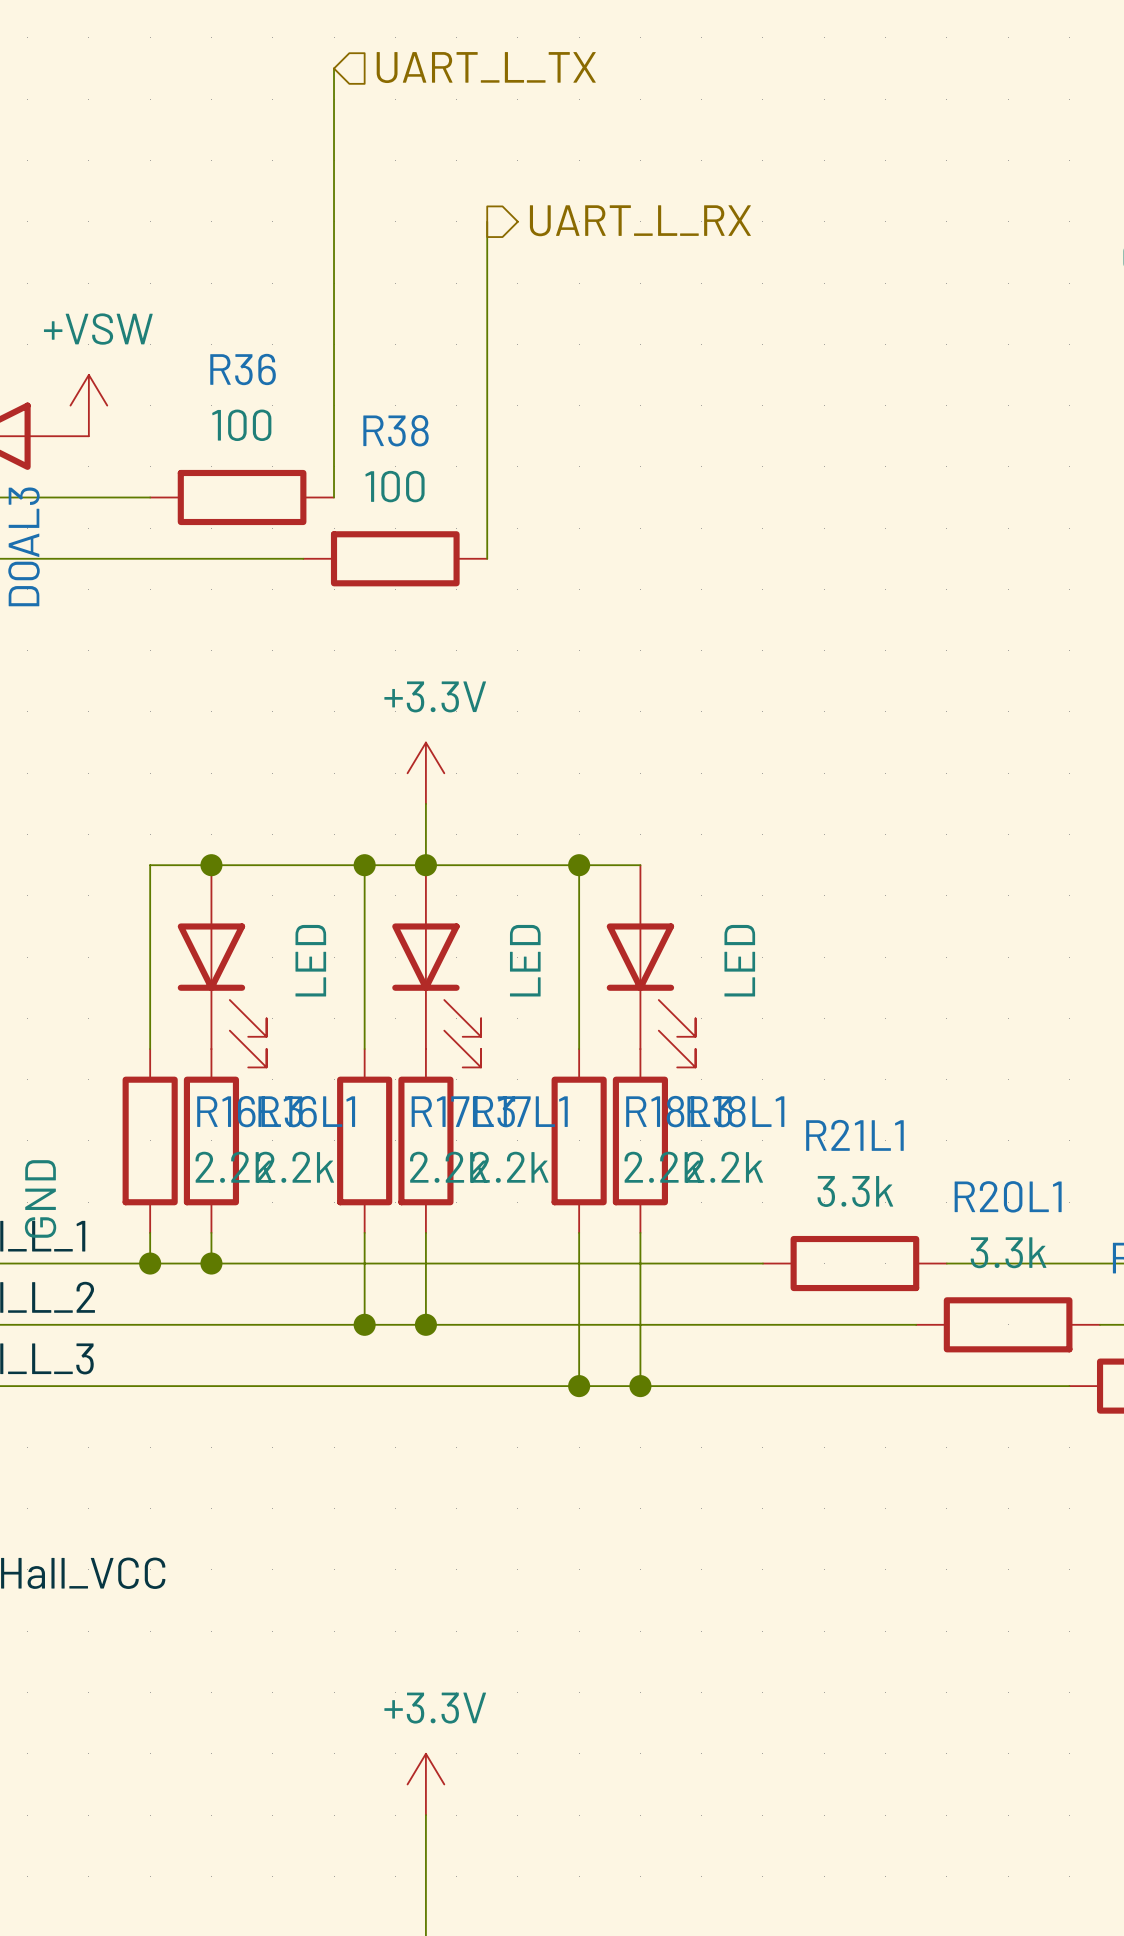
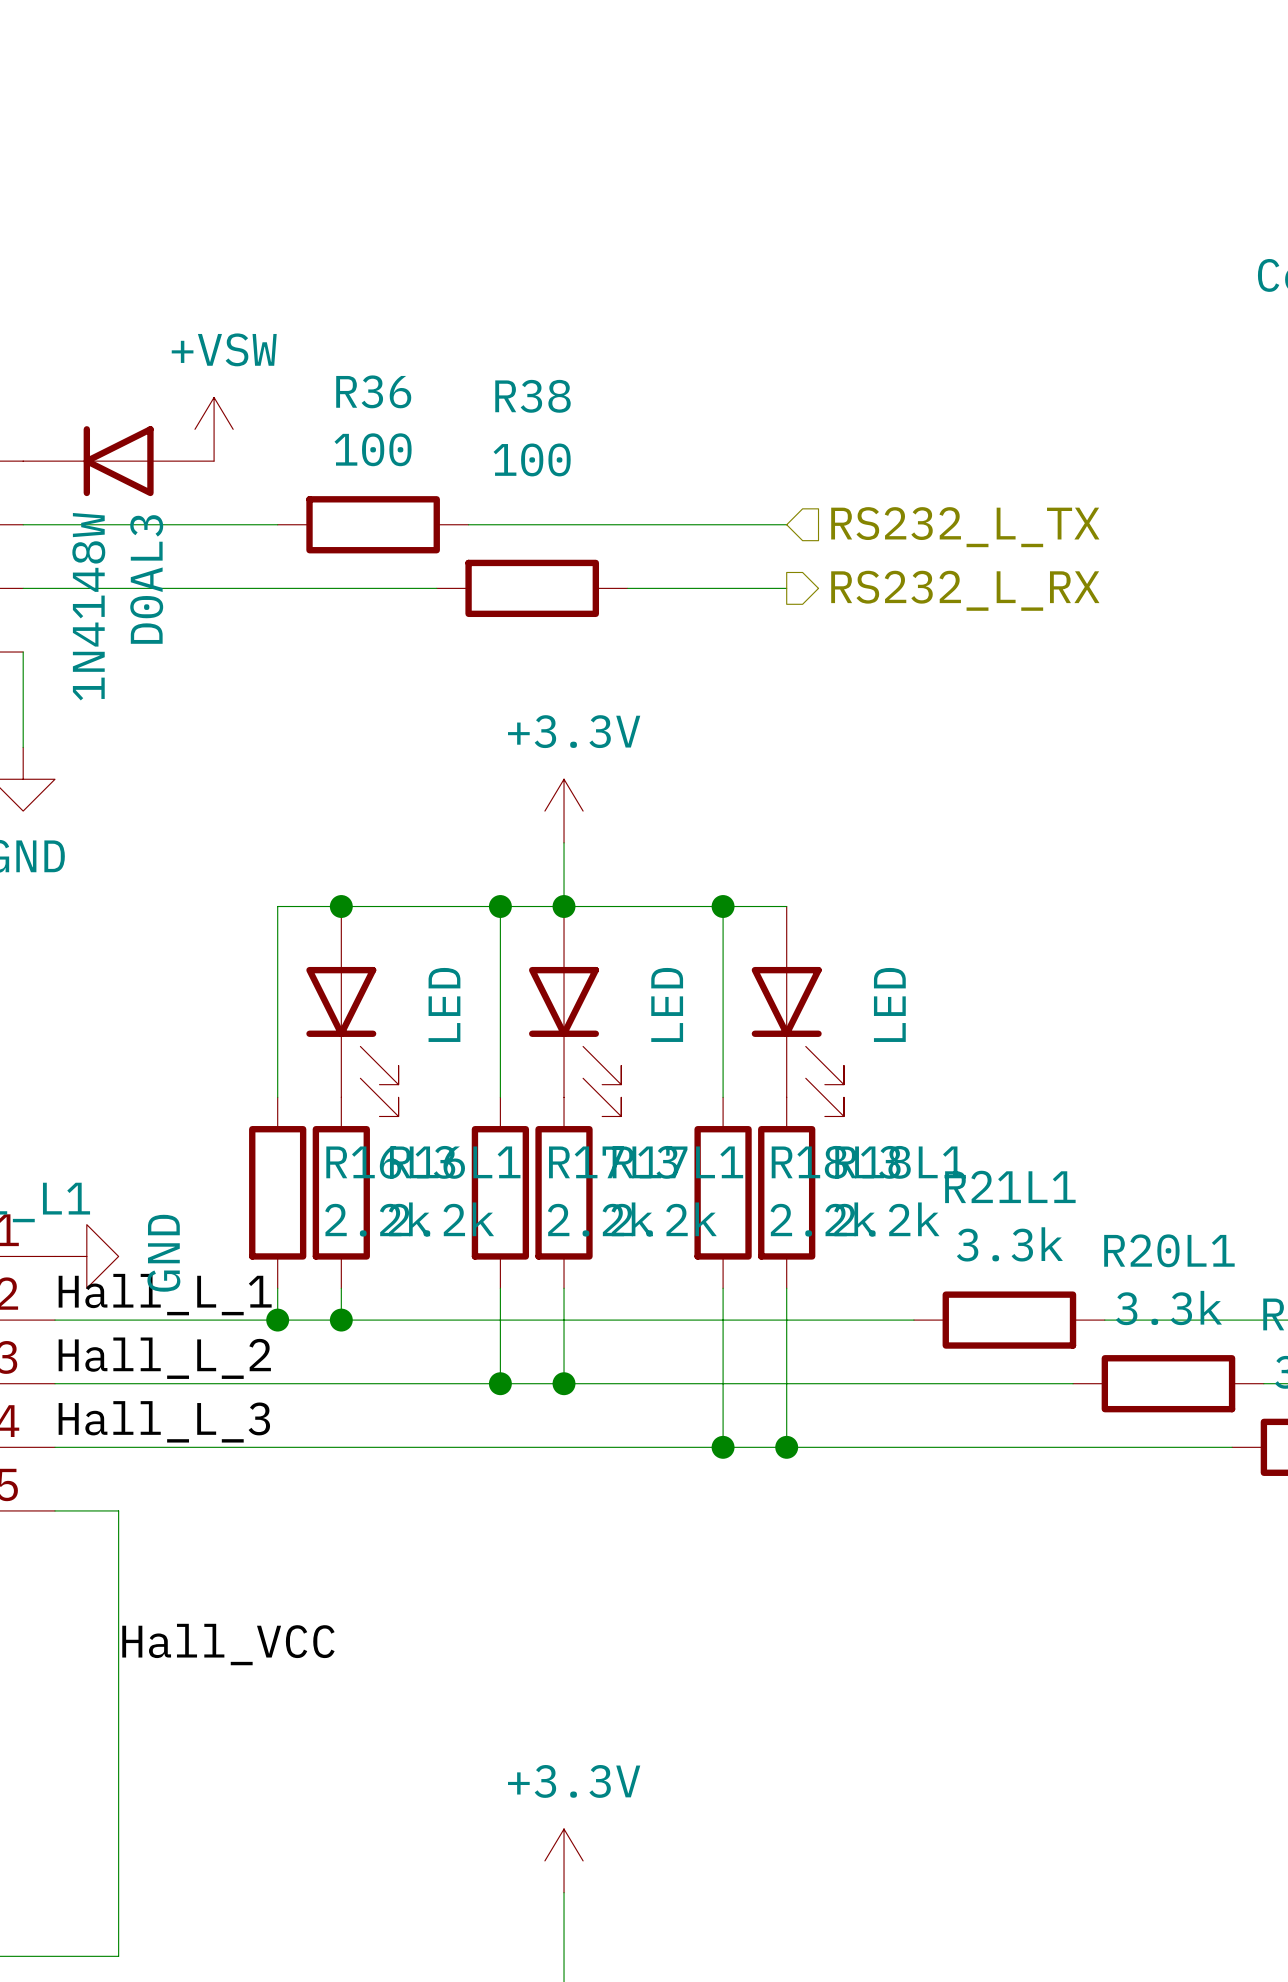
hierarchical label: UART_L_TX (486, 67) -> none
wire: (334, 68) (334, 497) -> (786, 524) (468, 524)
hierarchical label: UART_L_RX (640, 220) -> none
wire: (487, 221) (487, 558) -> (786, 588) (627, 588)
R38 name position: R38 (396, 430) -> R38 (532, 396)
R38 value position: 100 (395, 486) -> 100 (532, 459)
hierarchical label: none -> RS232_L_TX (965, 527)
hierarchical label: none -> RS232_L_RX (965, 590)

